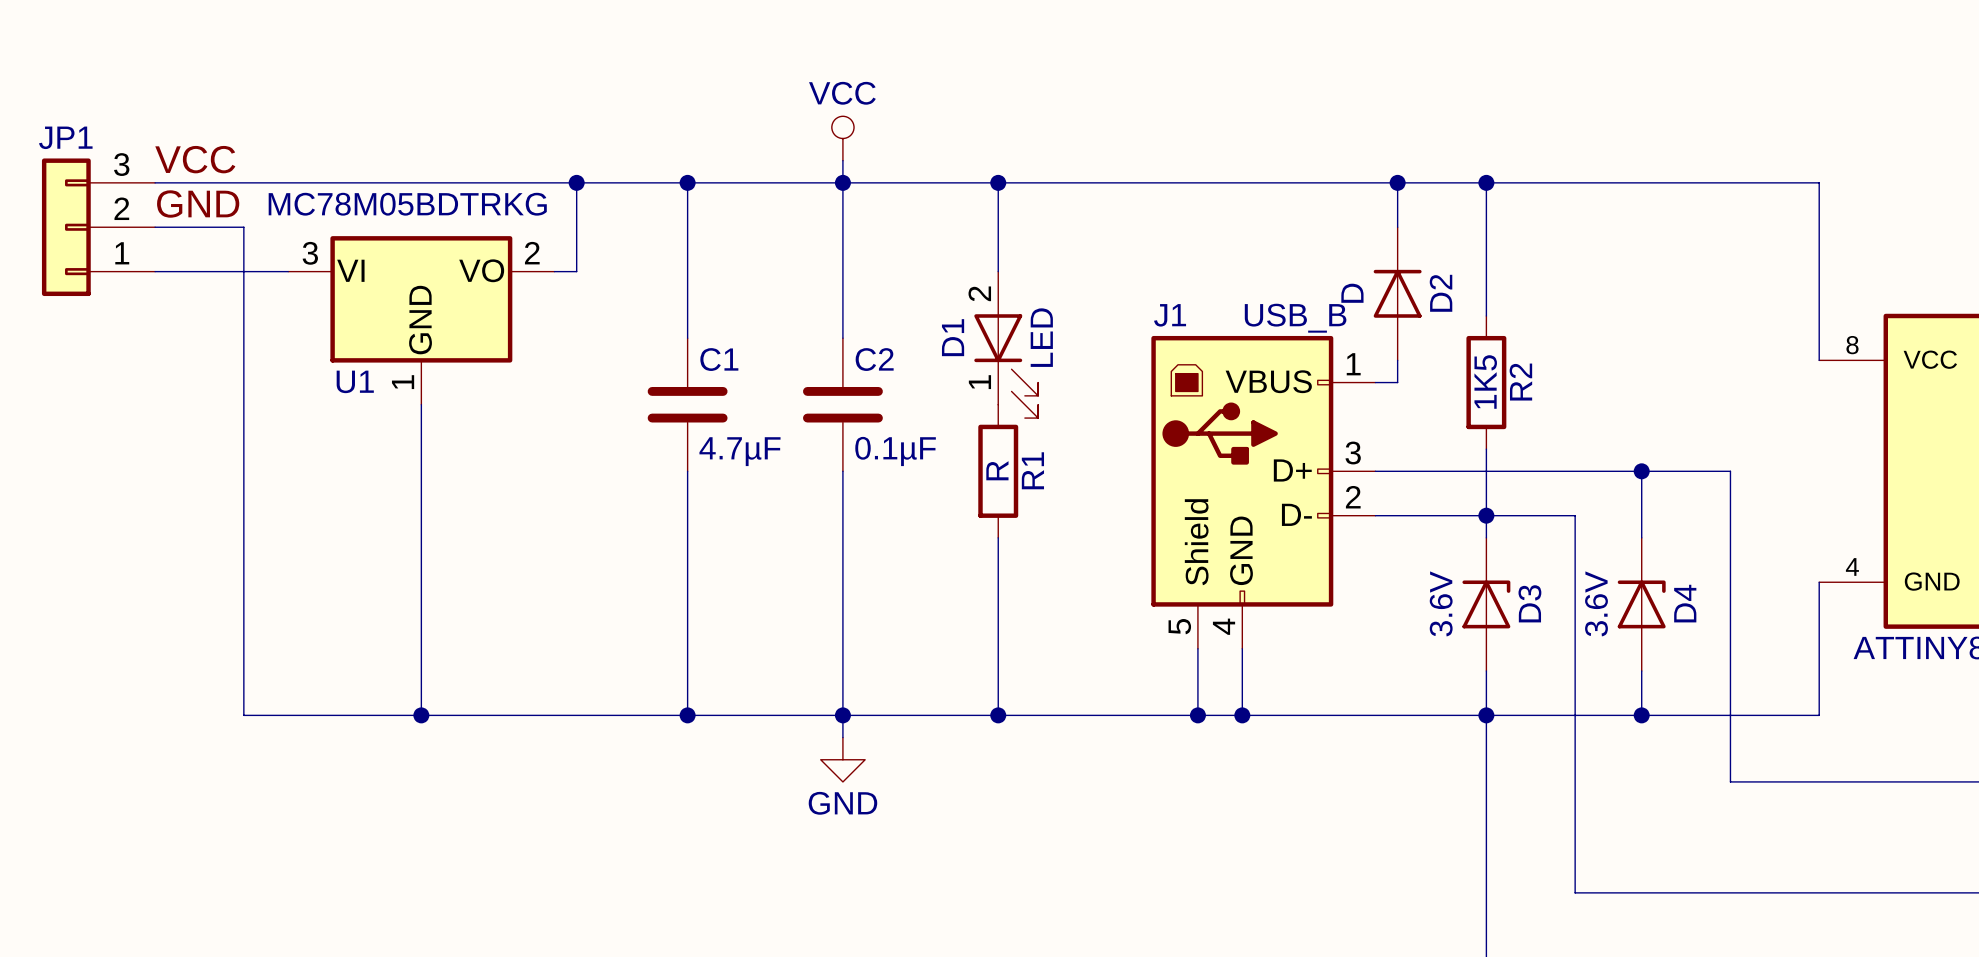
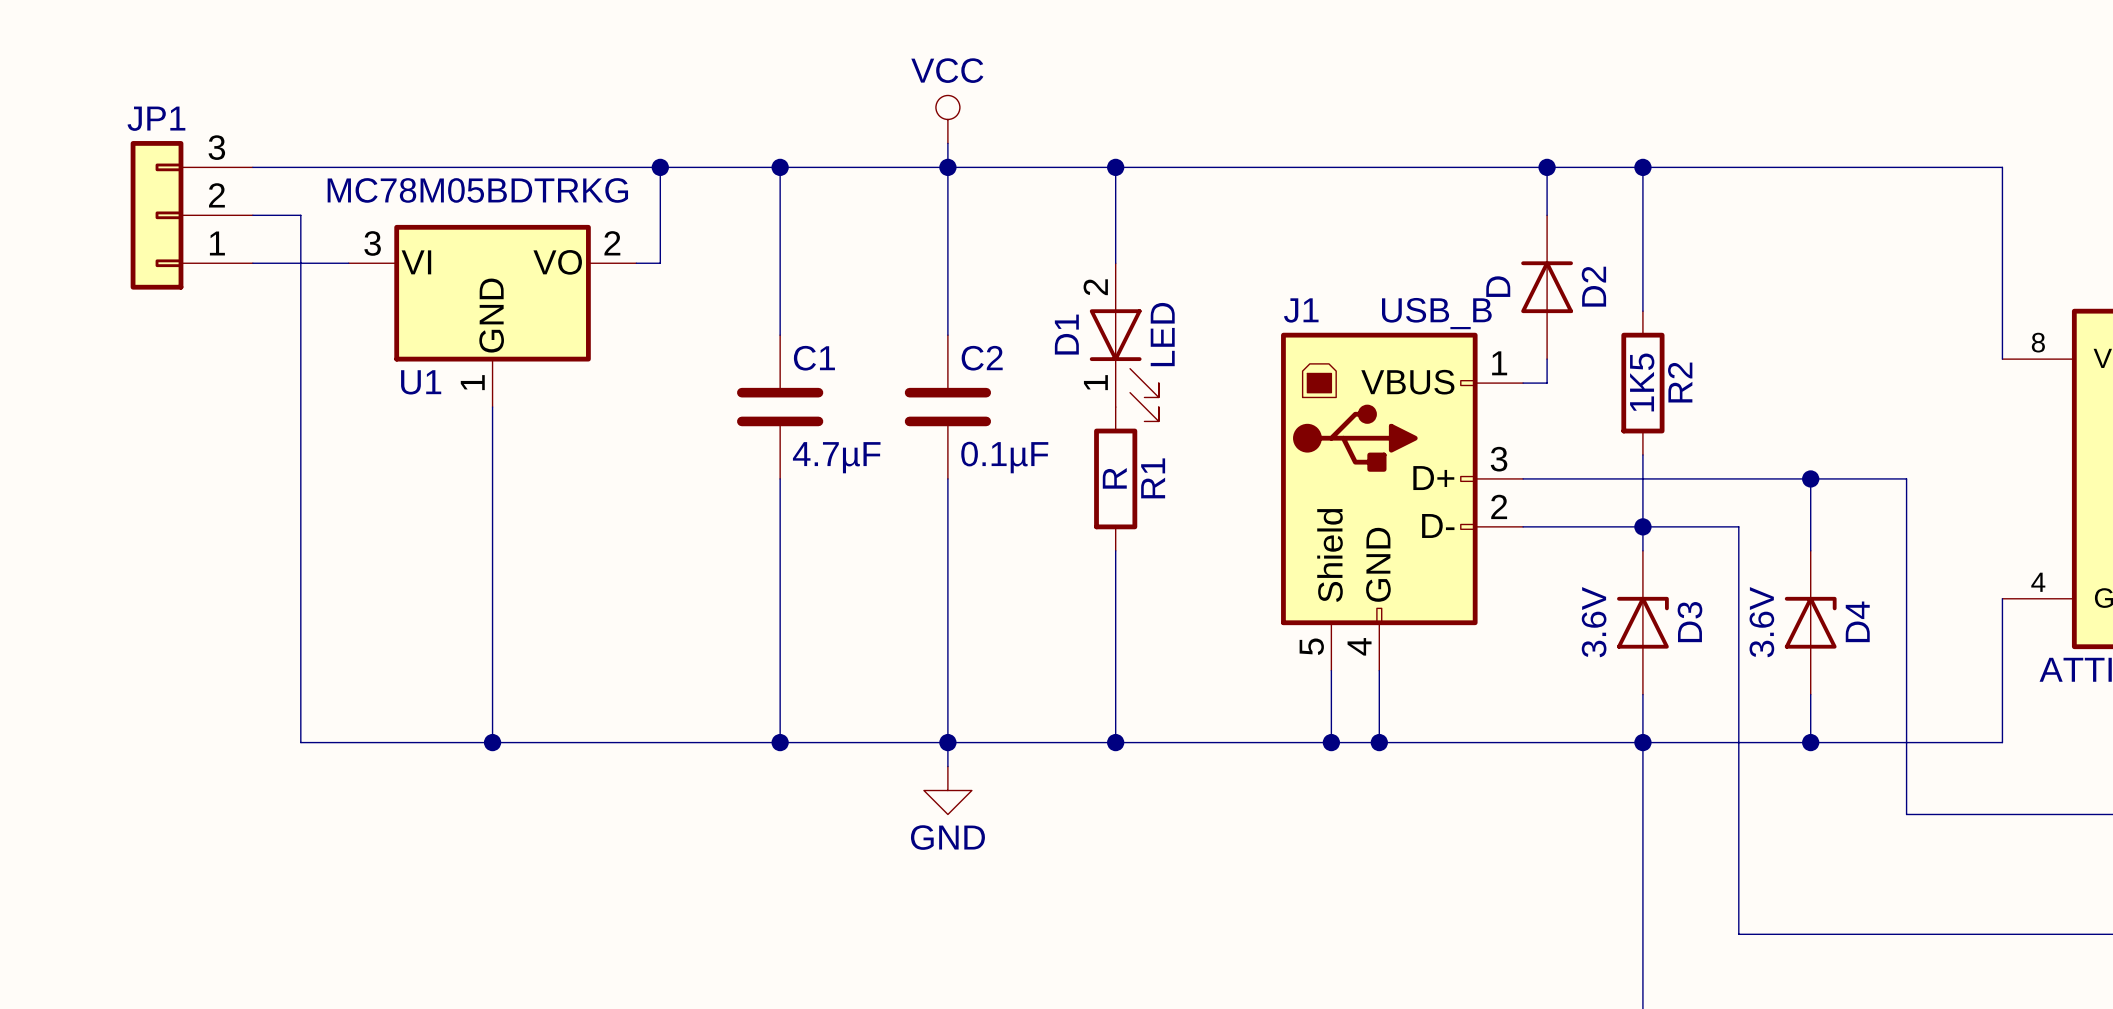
label: VCC (195, 159) -> none
label: GND (198, 204) -> none
JP1 position: (98, 227) -> (191, 215)

